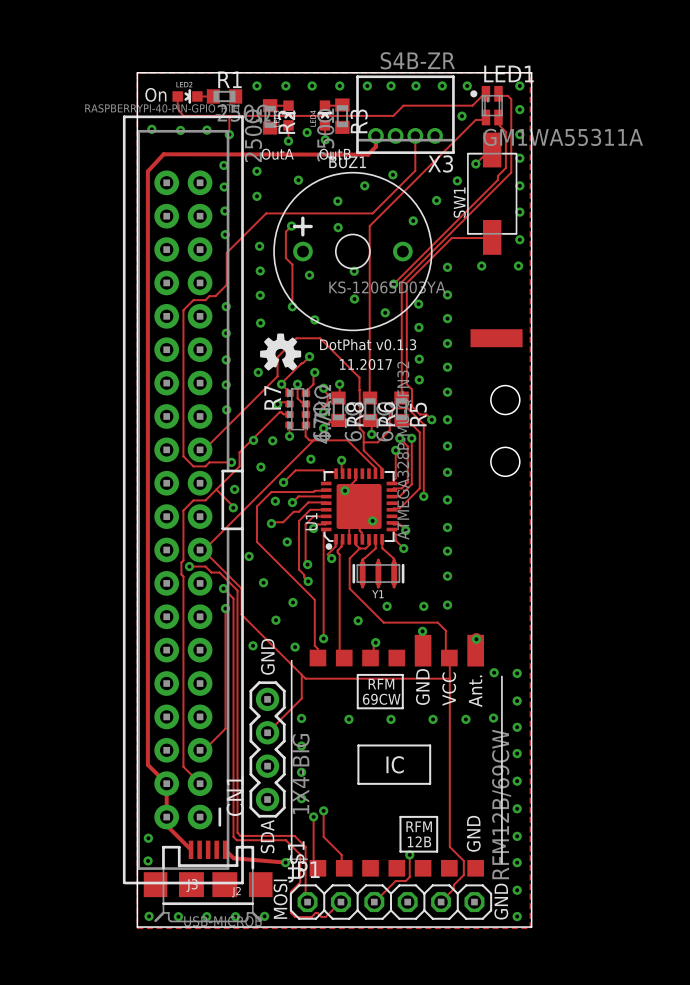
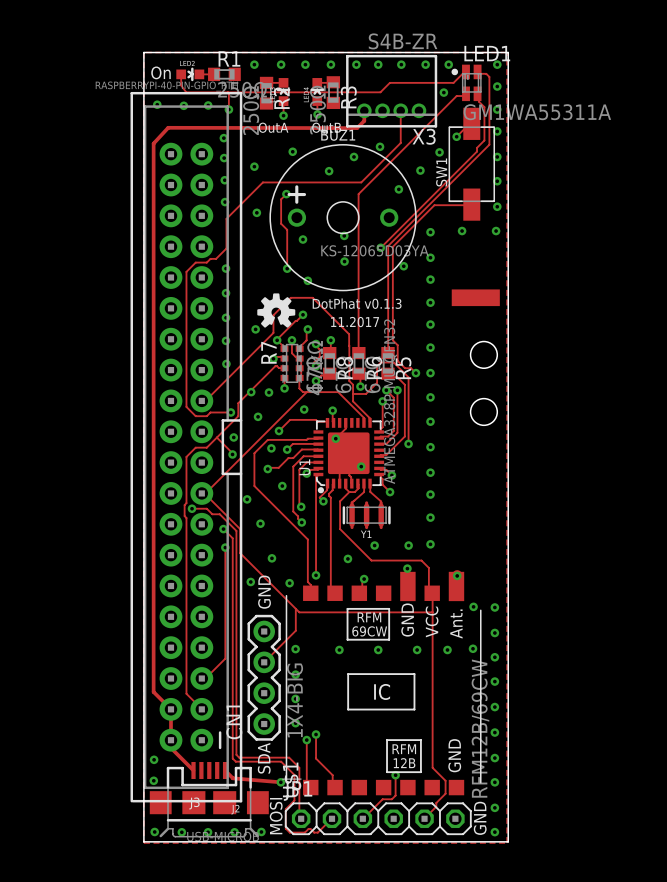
via: (307, 132) -> none
via: (256, 171) -> none
via: (338, 227) -> none
via: (260, 270) -> none
via: (260, 295) -> none
via: (385, 312) -> none
via: (260, 323) -> none
via: (418, 327) -> none
via: (419, 359) -> none
via: (419, 379) -> none
via: (292, 602) -> none

